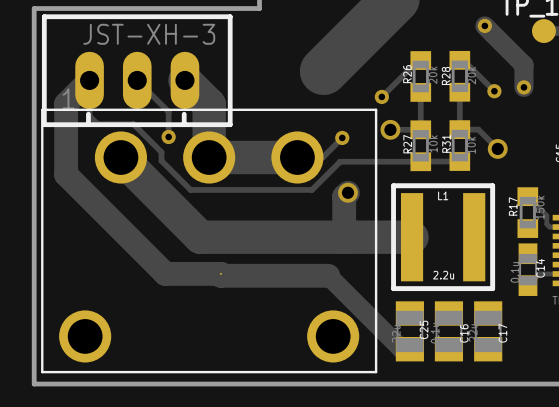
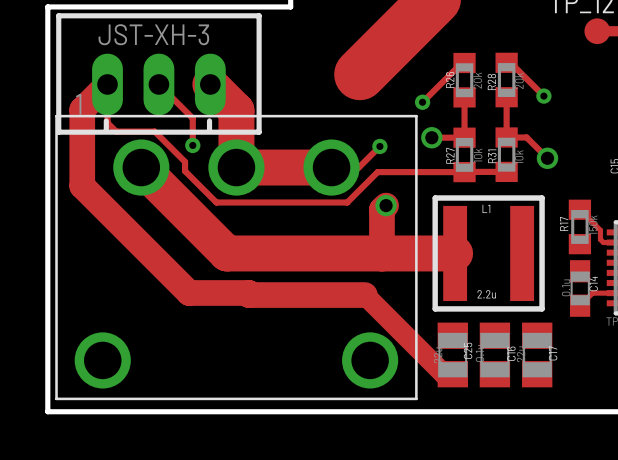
track: (484, 25) (523, 65) (523, 87) -> none
via: (484, 25) -> none
via: (523, 87) -> none

